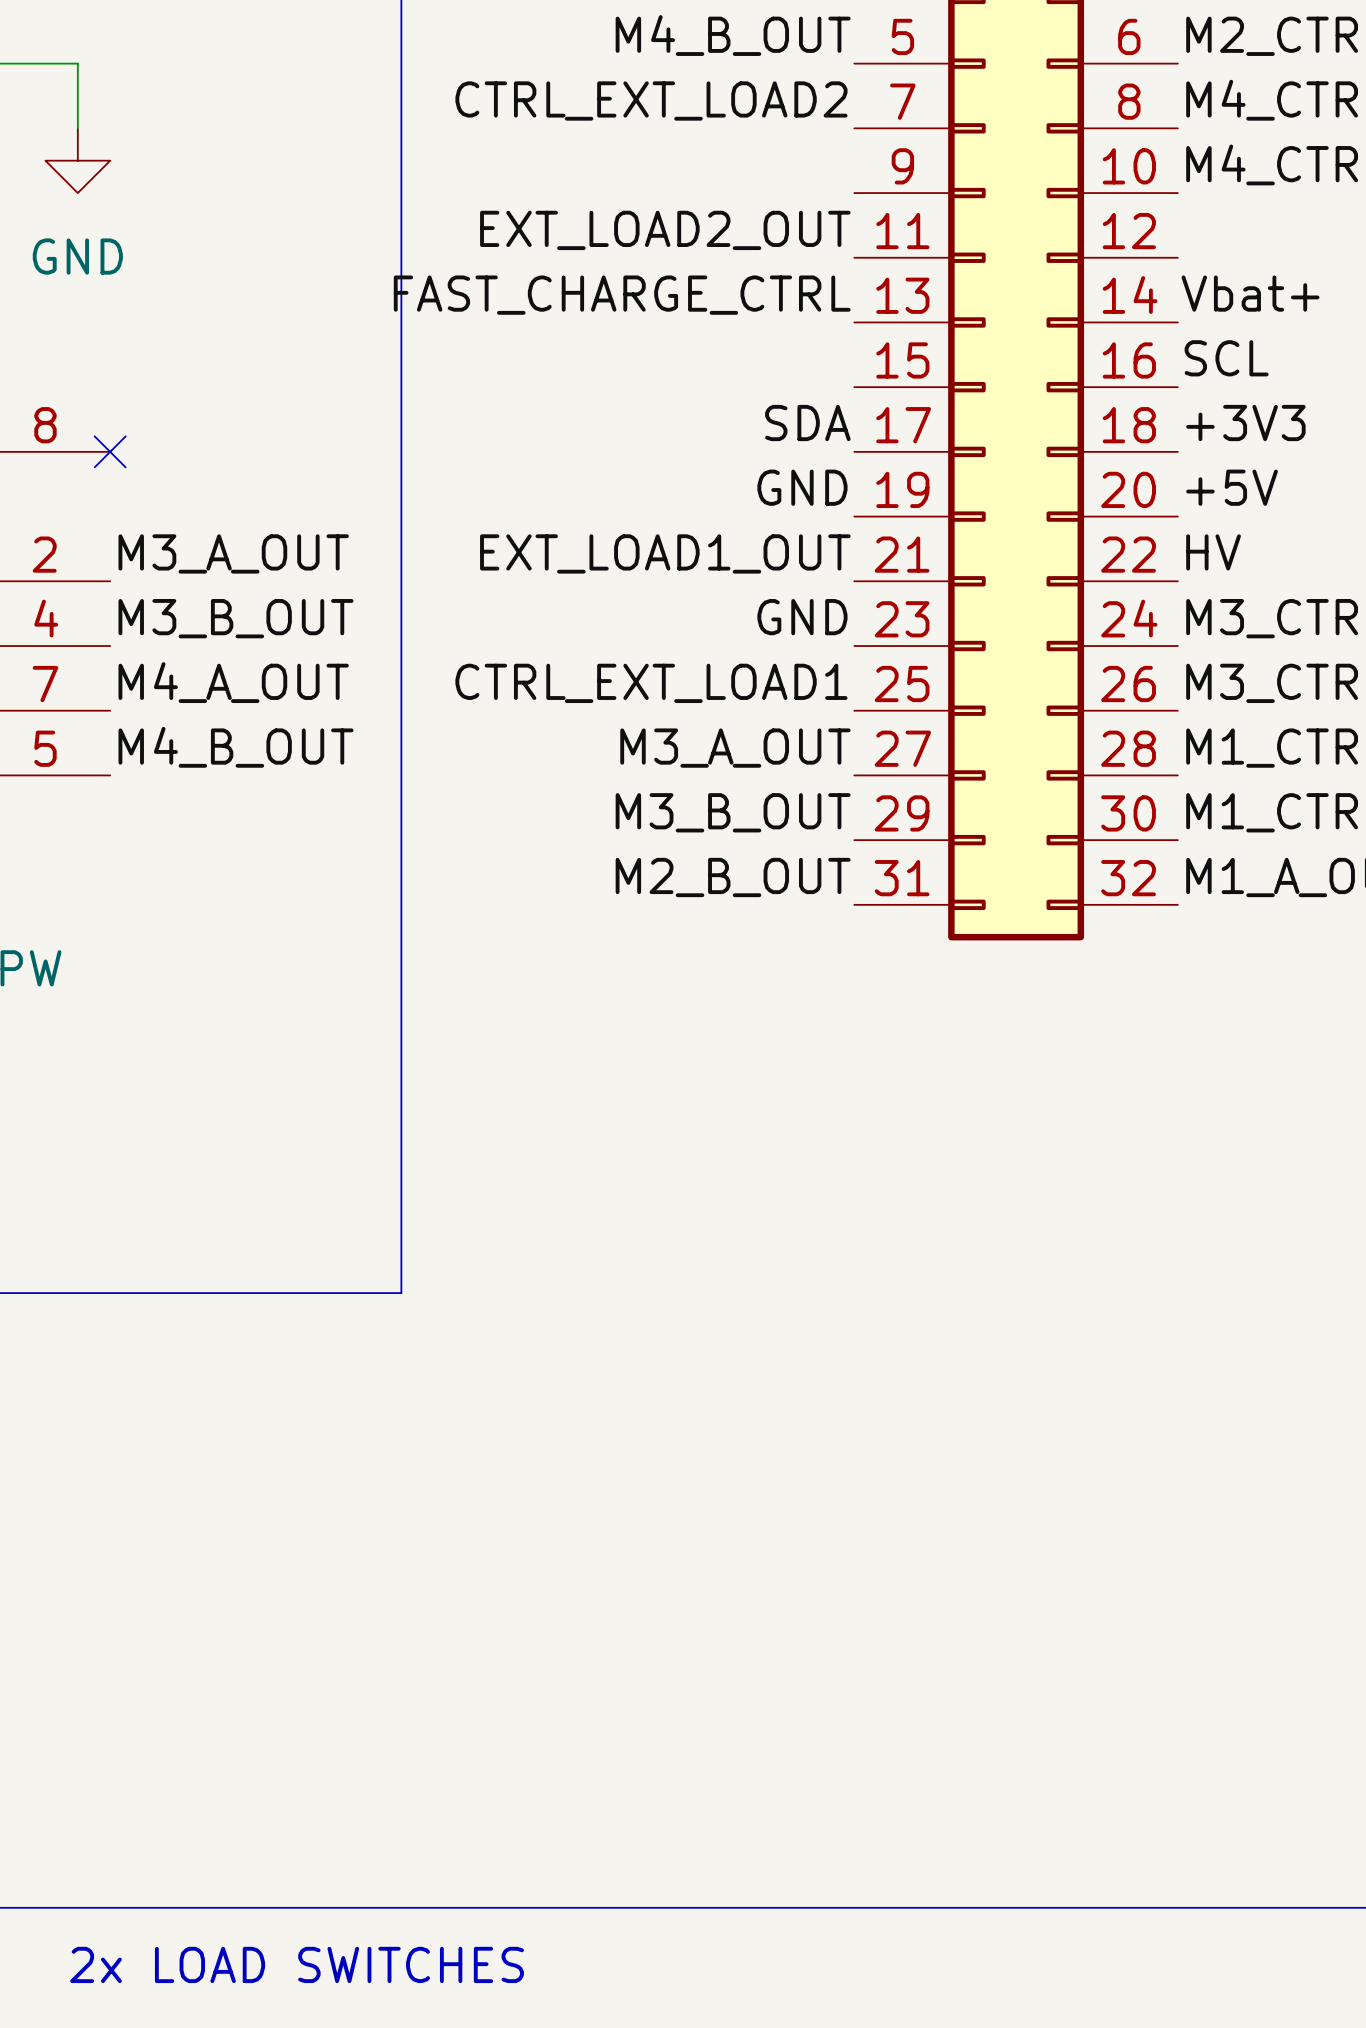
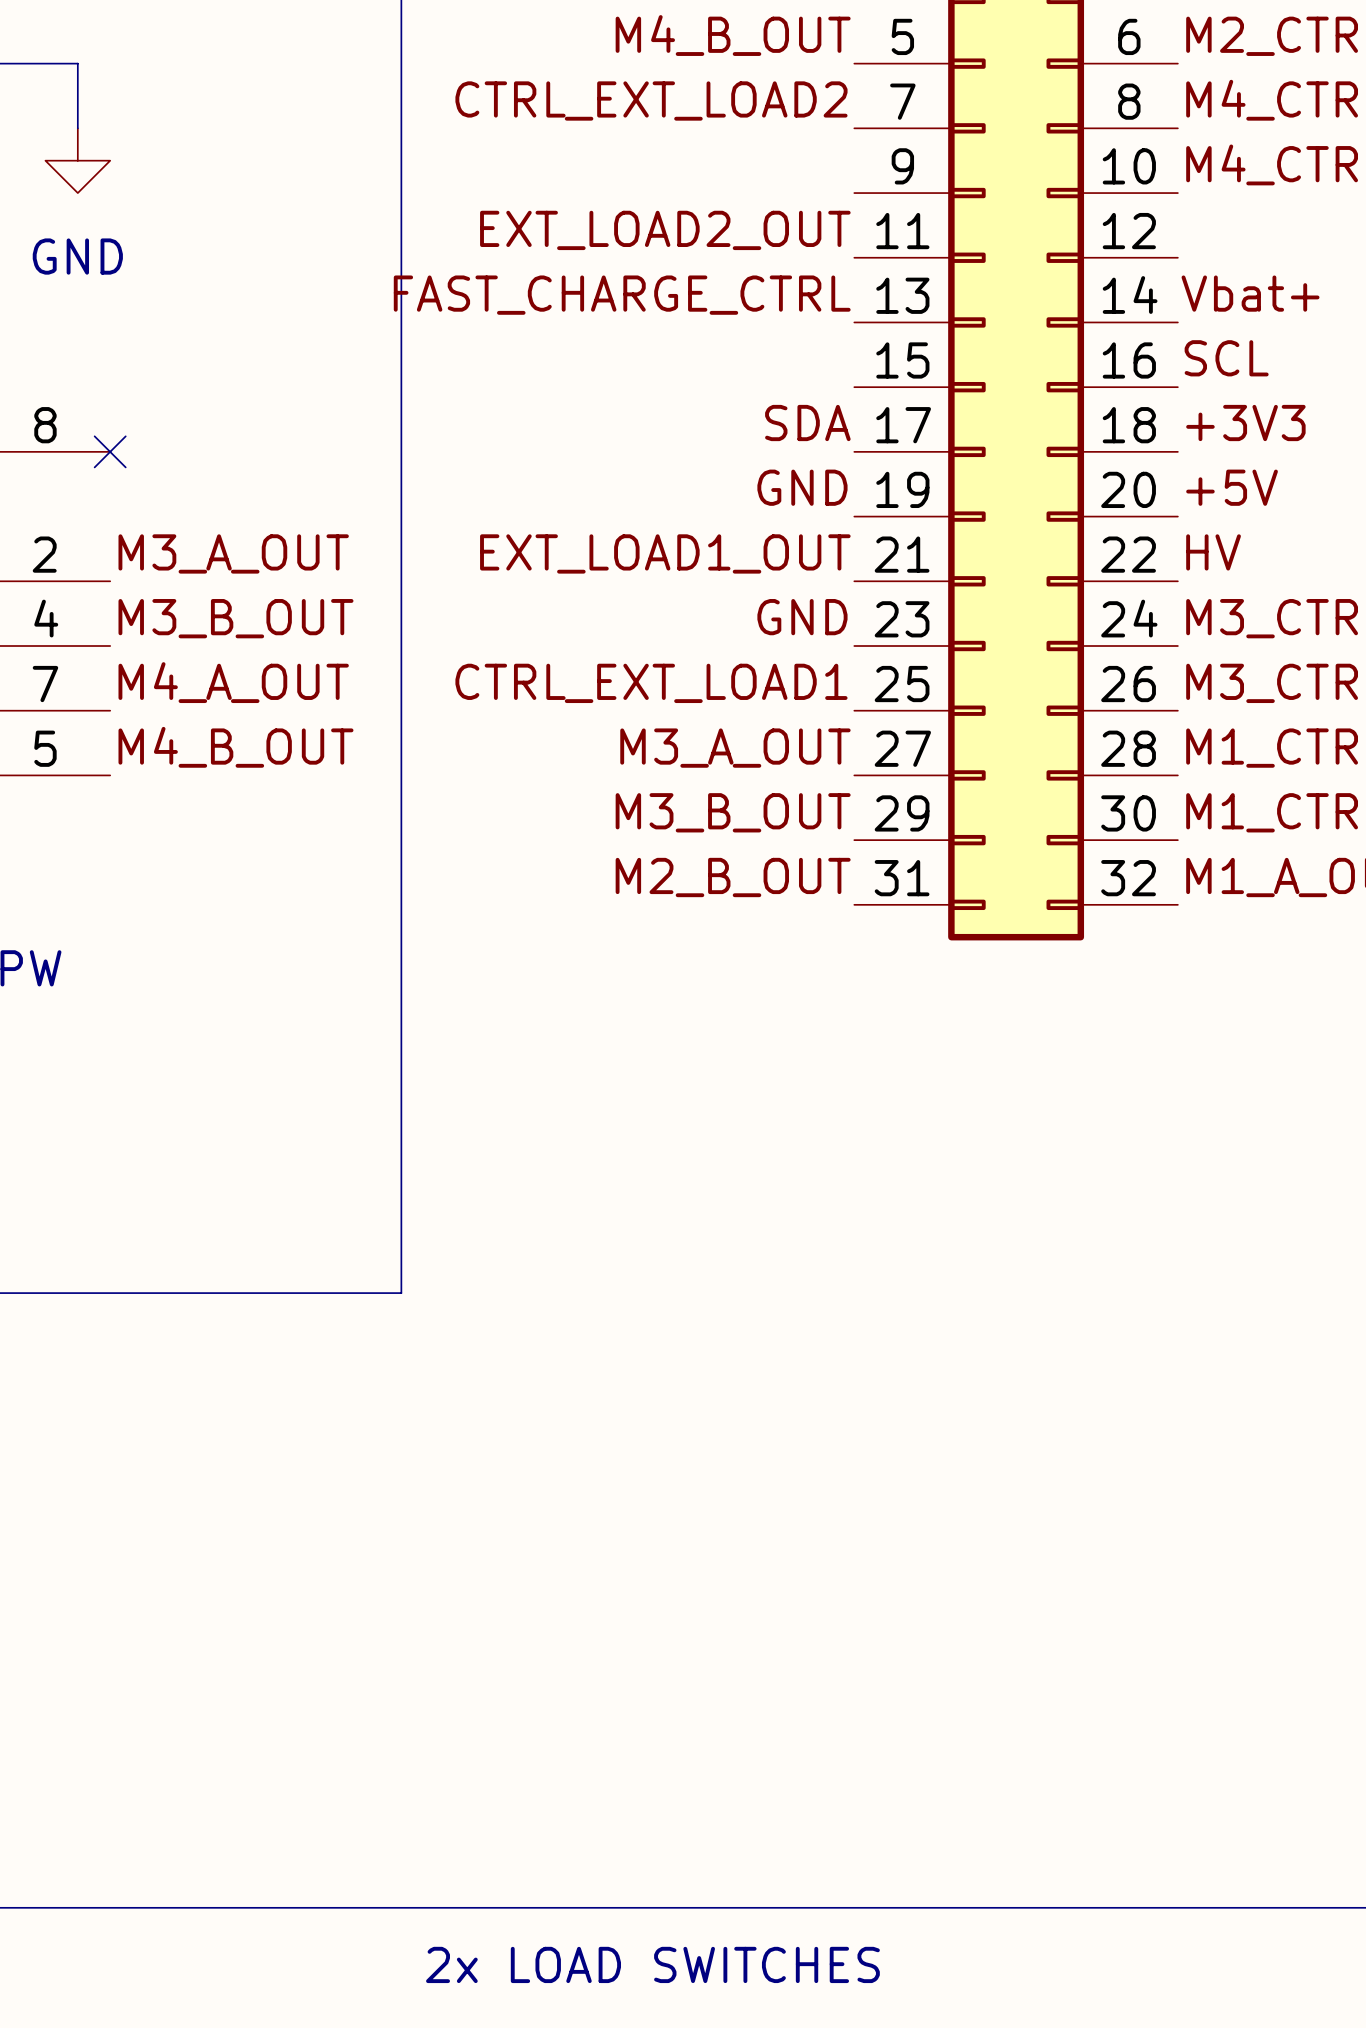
text position: 2x LOAD SWITCHES (297, 1964) -> 2x LOAD SWITCHES (652, 1964)

